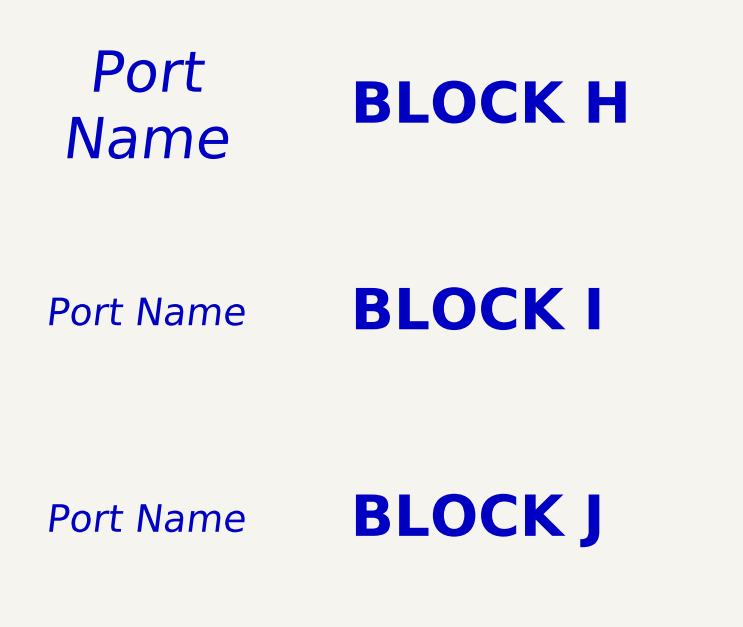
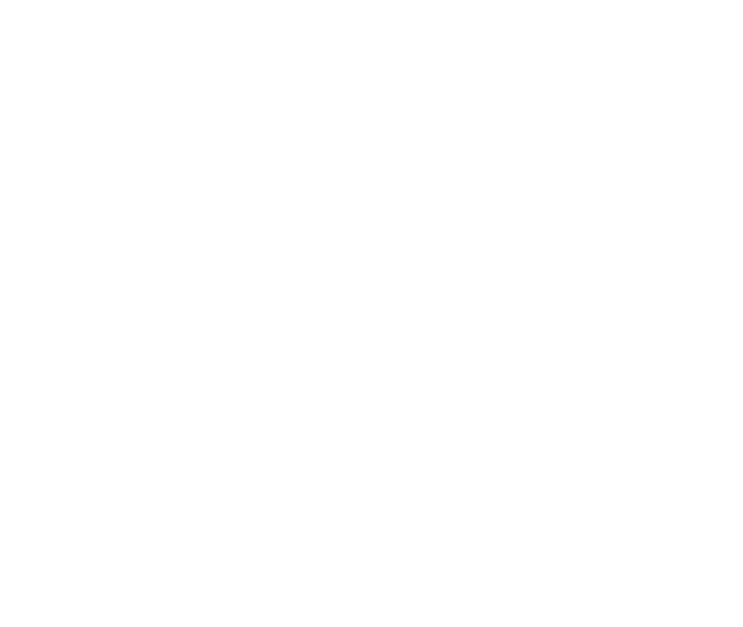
text: Port (149, 71) -> none
text: BLOCK H (490, 102) -> none
text: Name (148, 137) -> none
text: BLOCK I (477, 308) -> none
text: Port Name (147, 311) -> none
text: Port Name (147, 518) -> none
text: BLOCK J (477, 520) -> none

